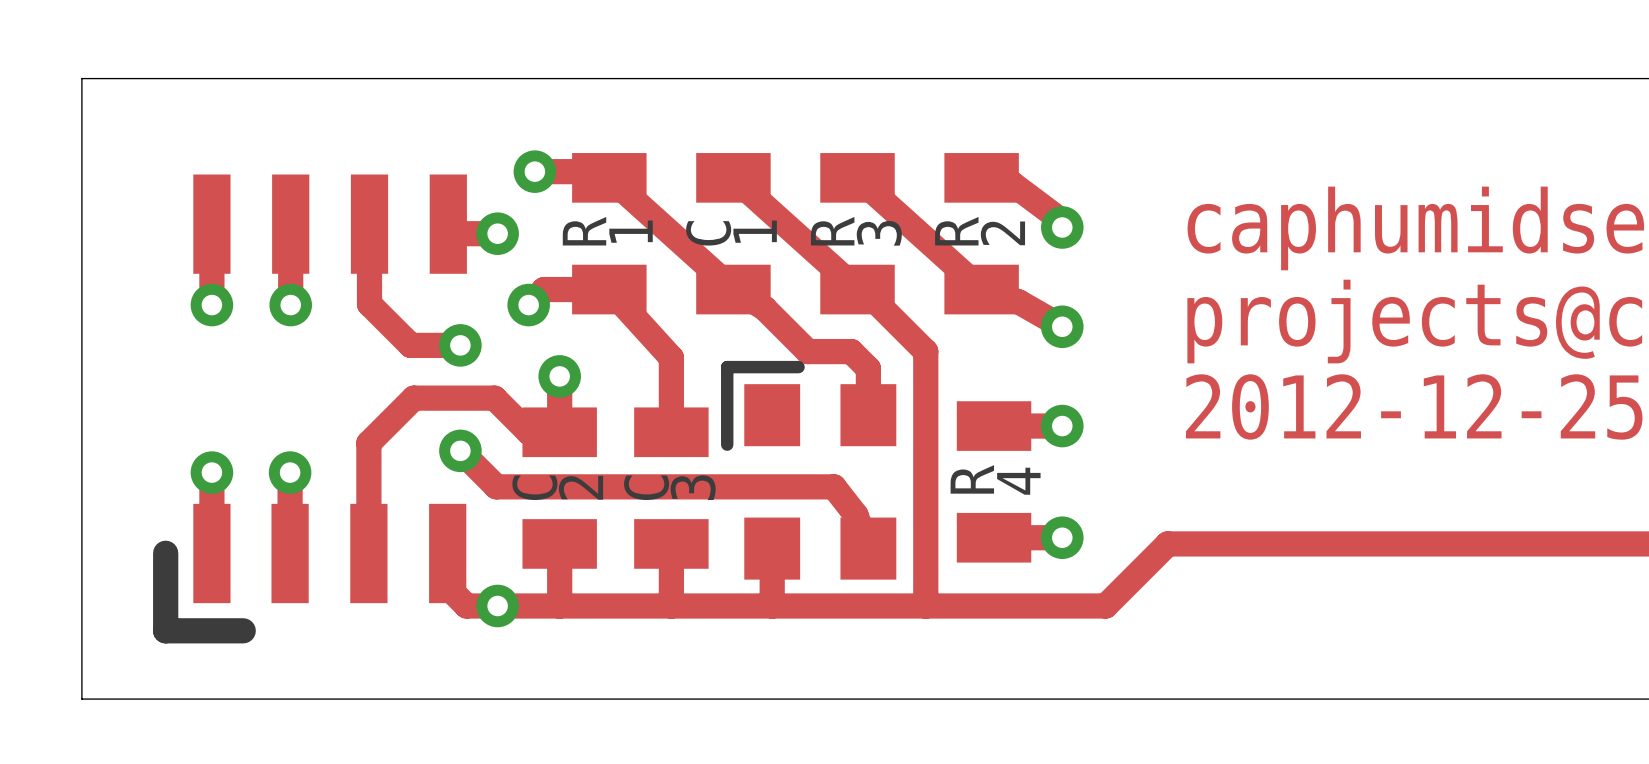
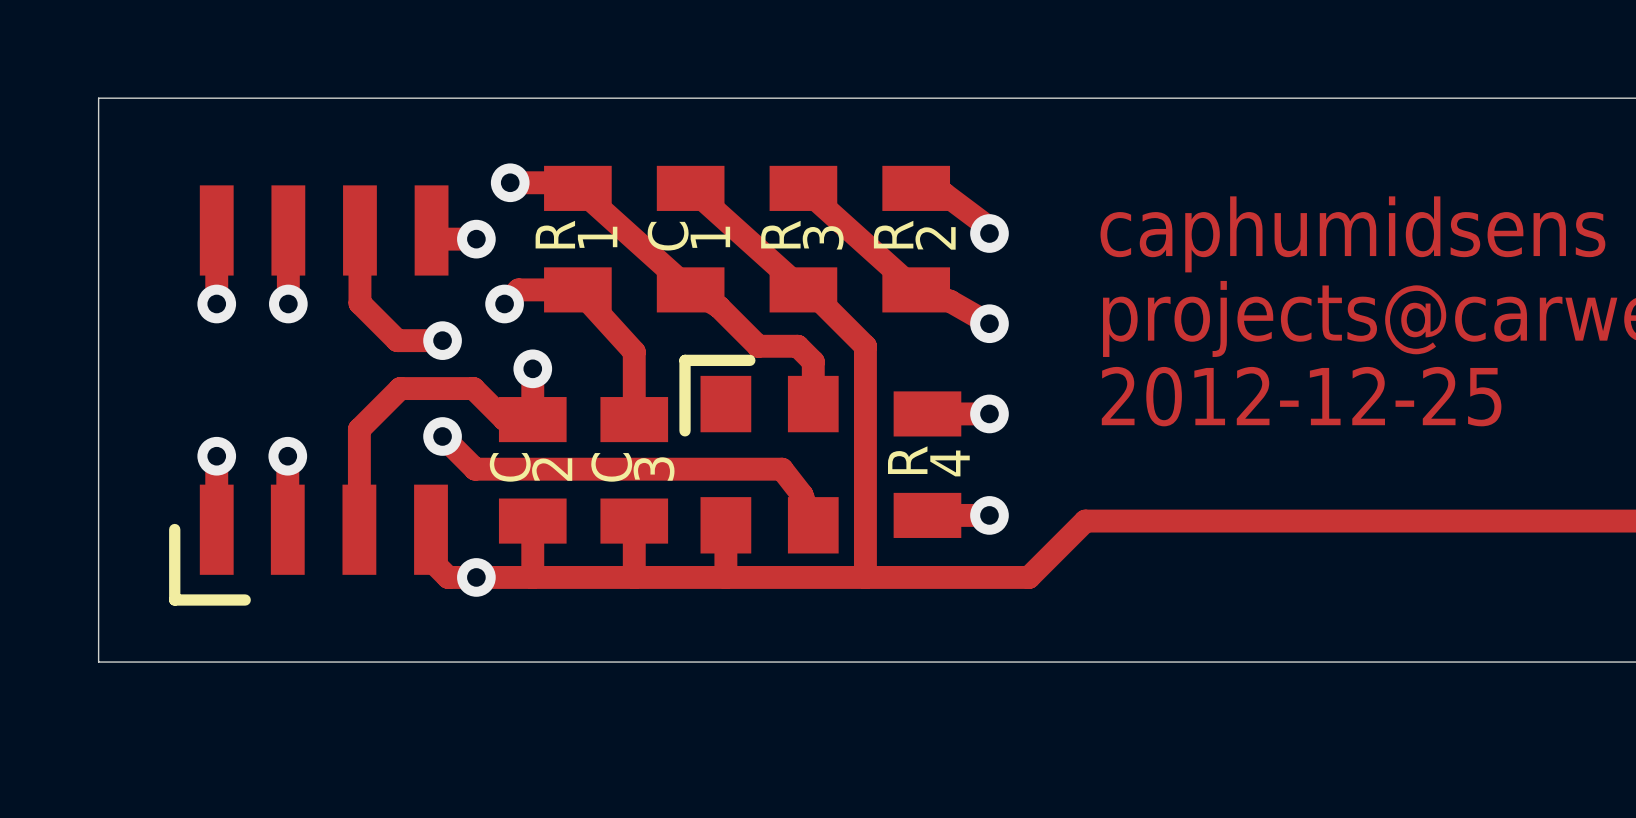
line width: thick (165, 553) (165, 630) (243, 630) -> thin (174, 529) (174, 600) (245, 600)

